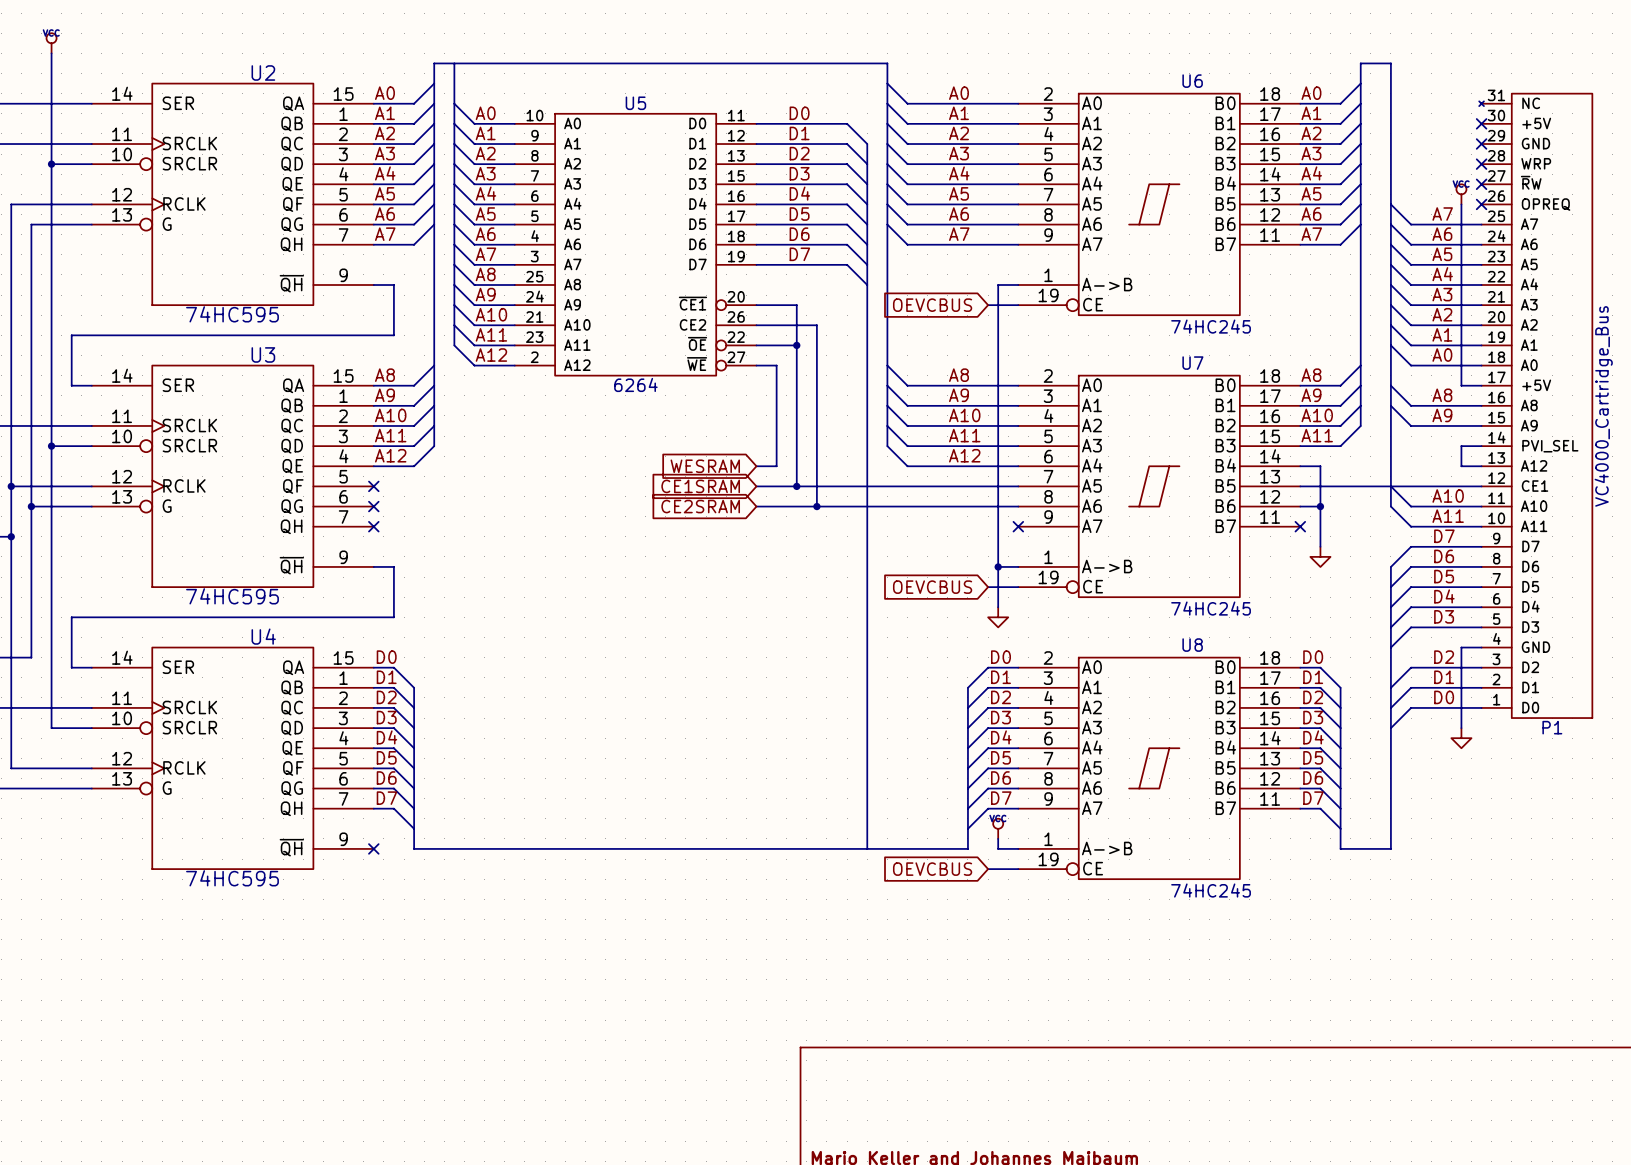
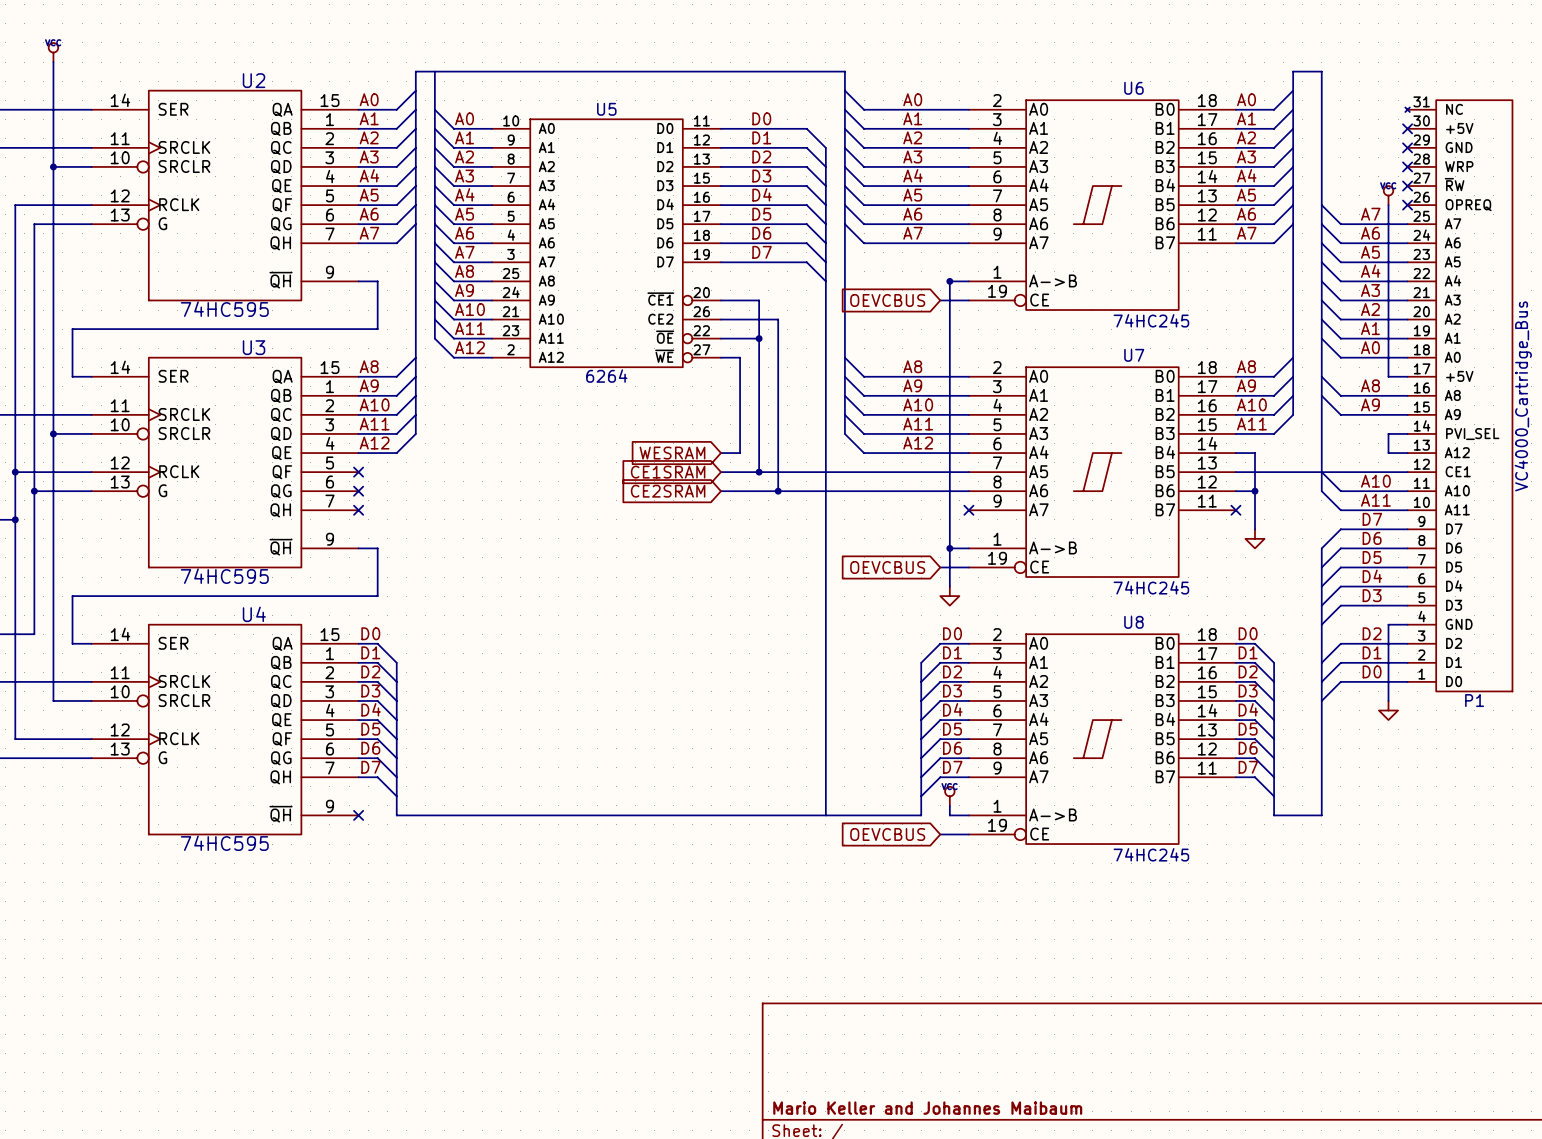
junction: none -> (949, 281)

